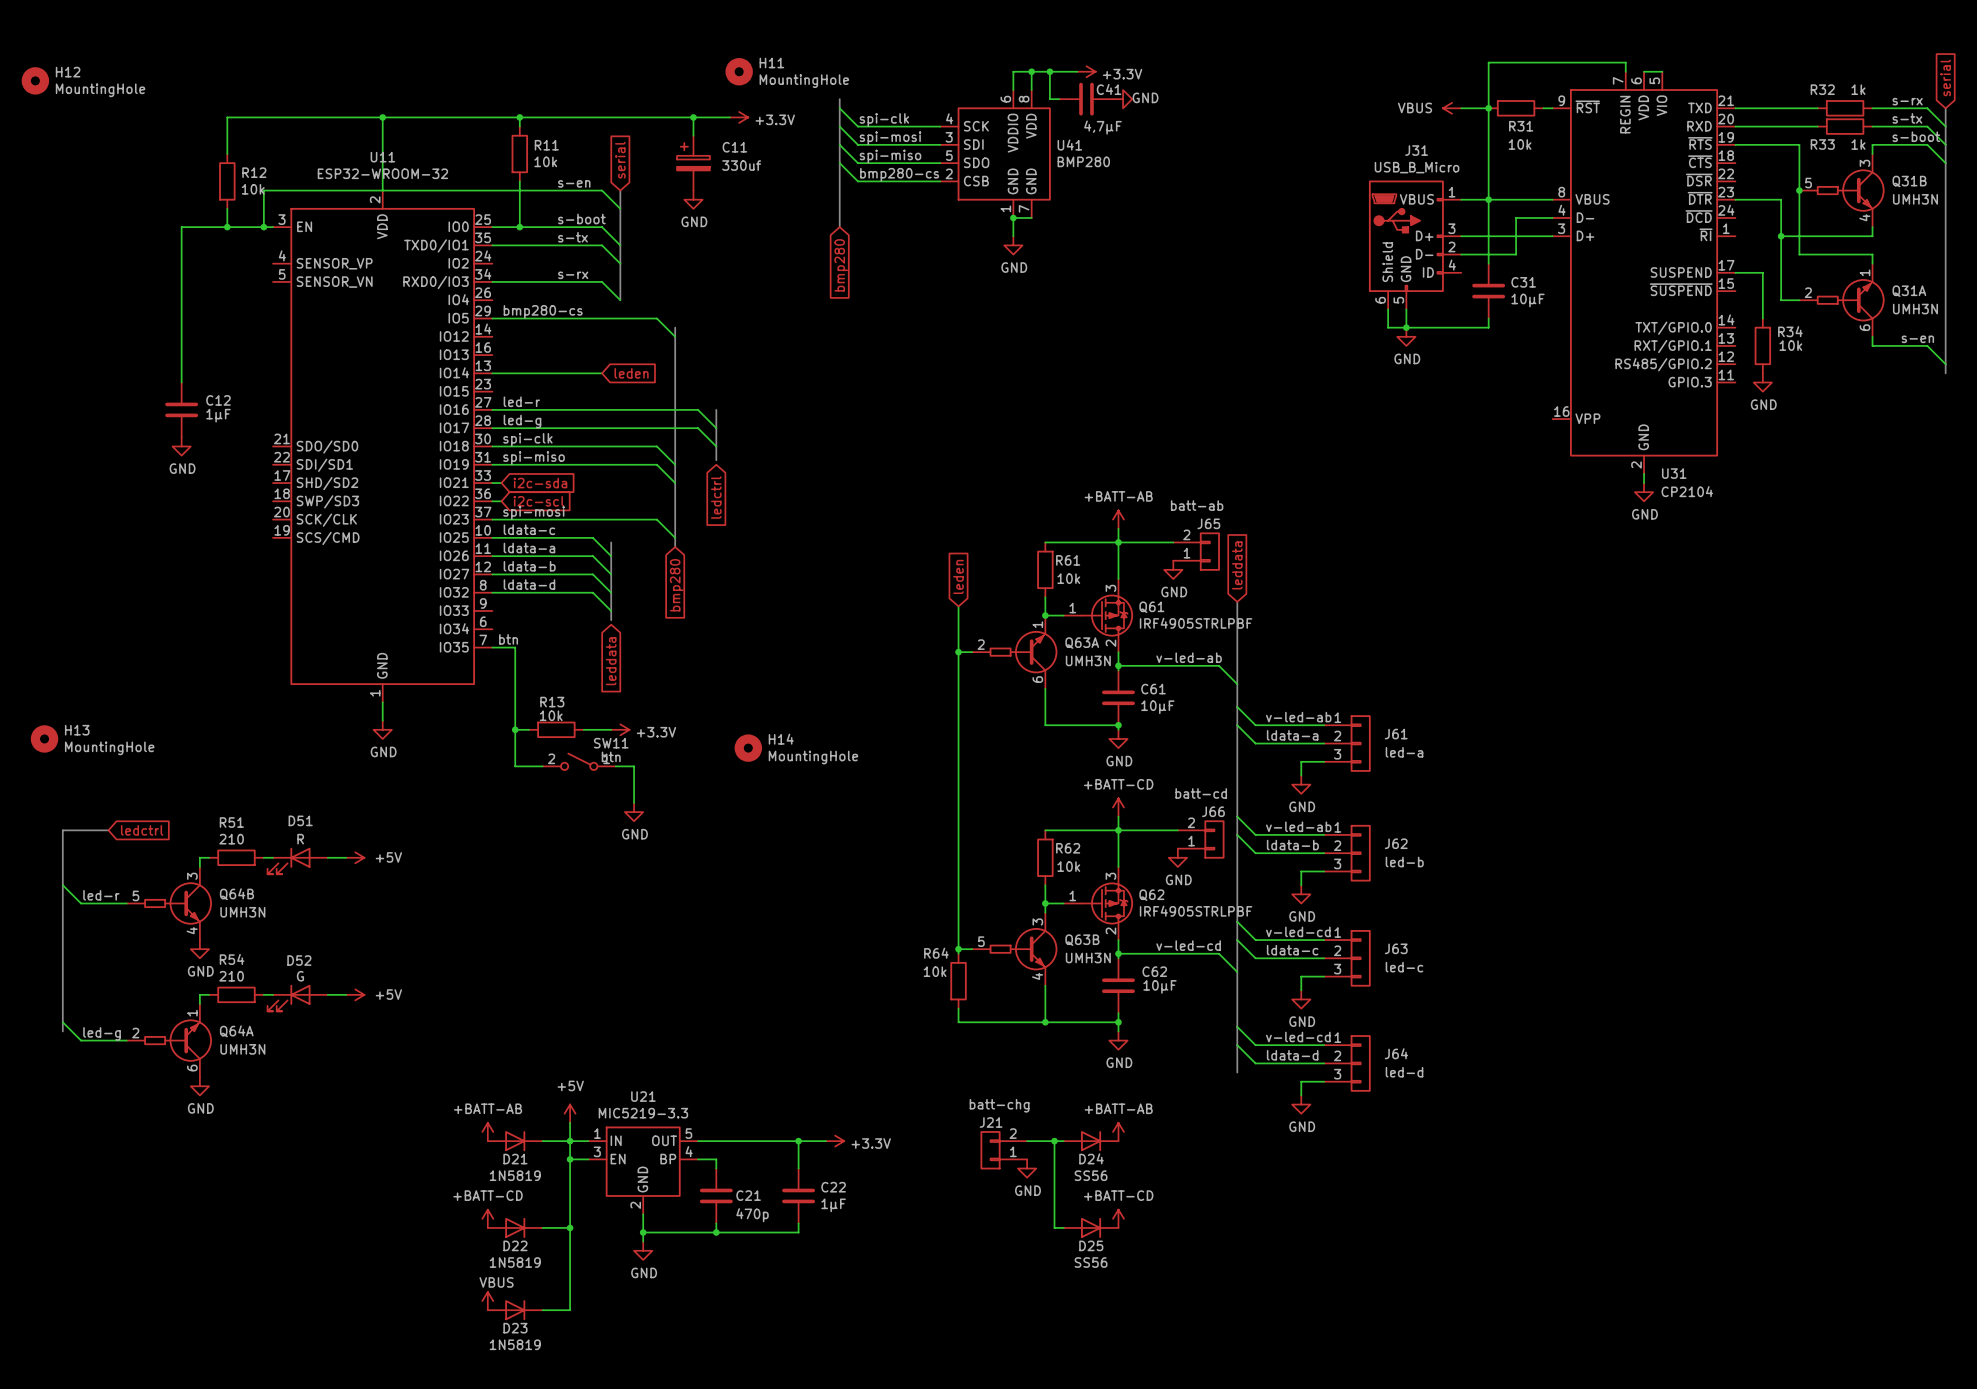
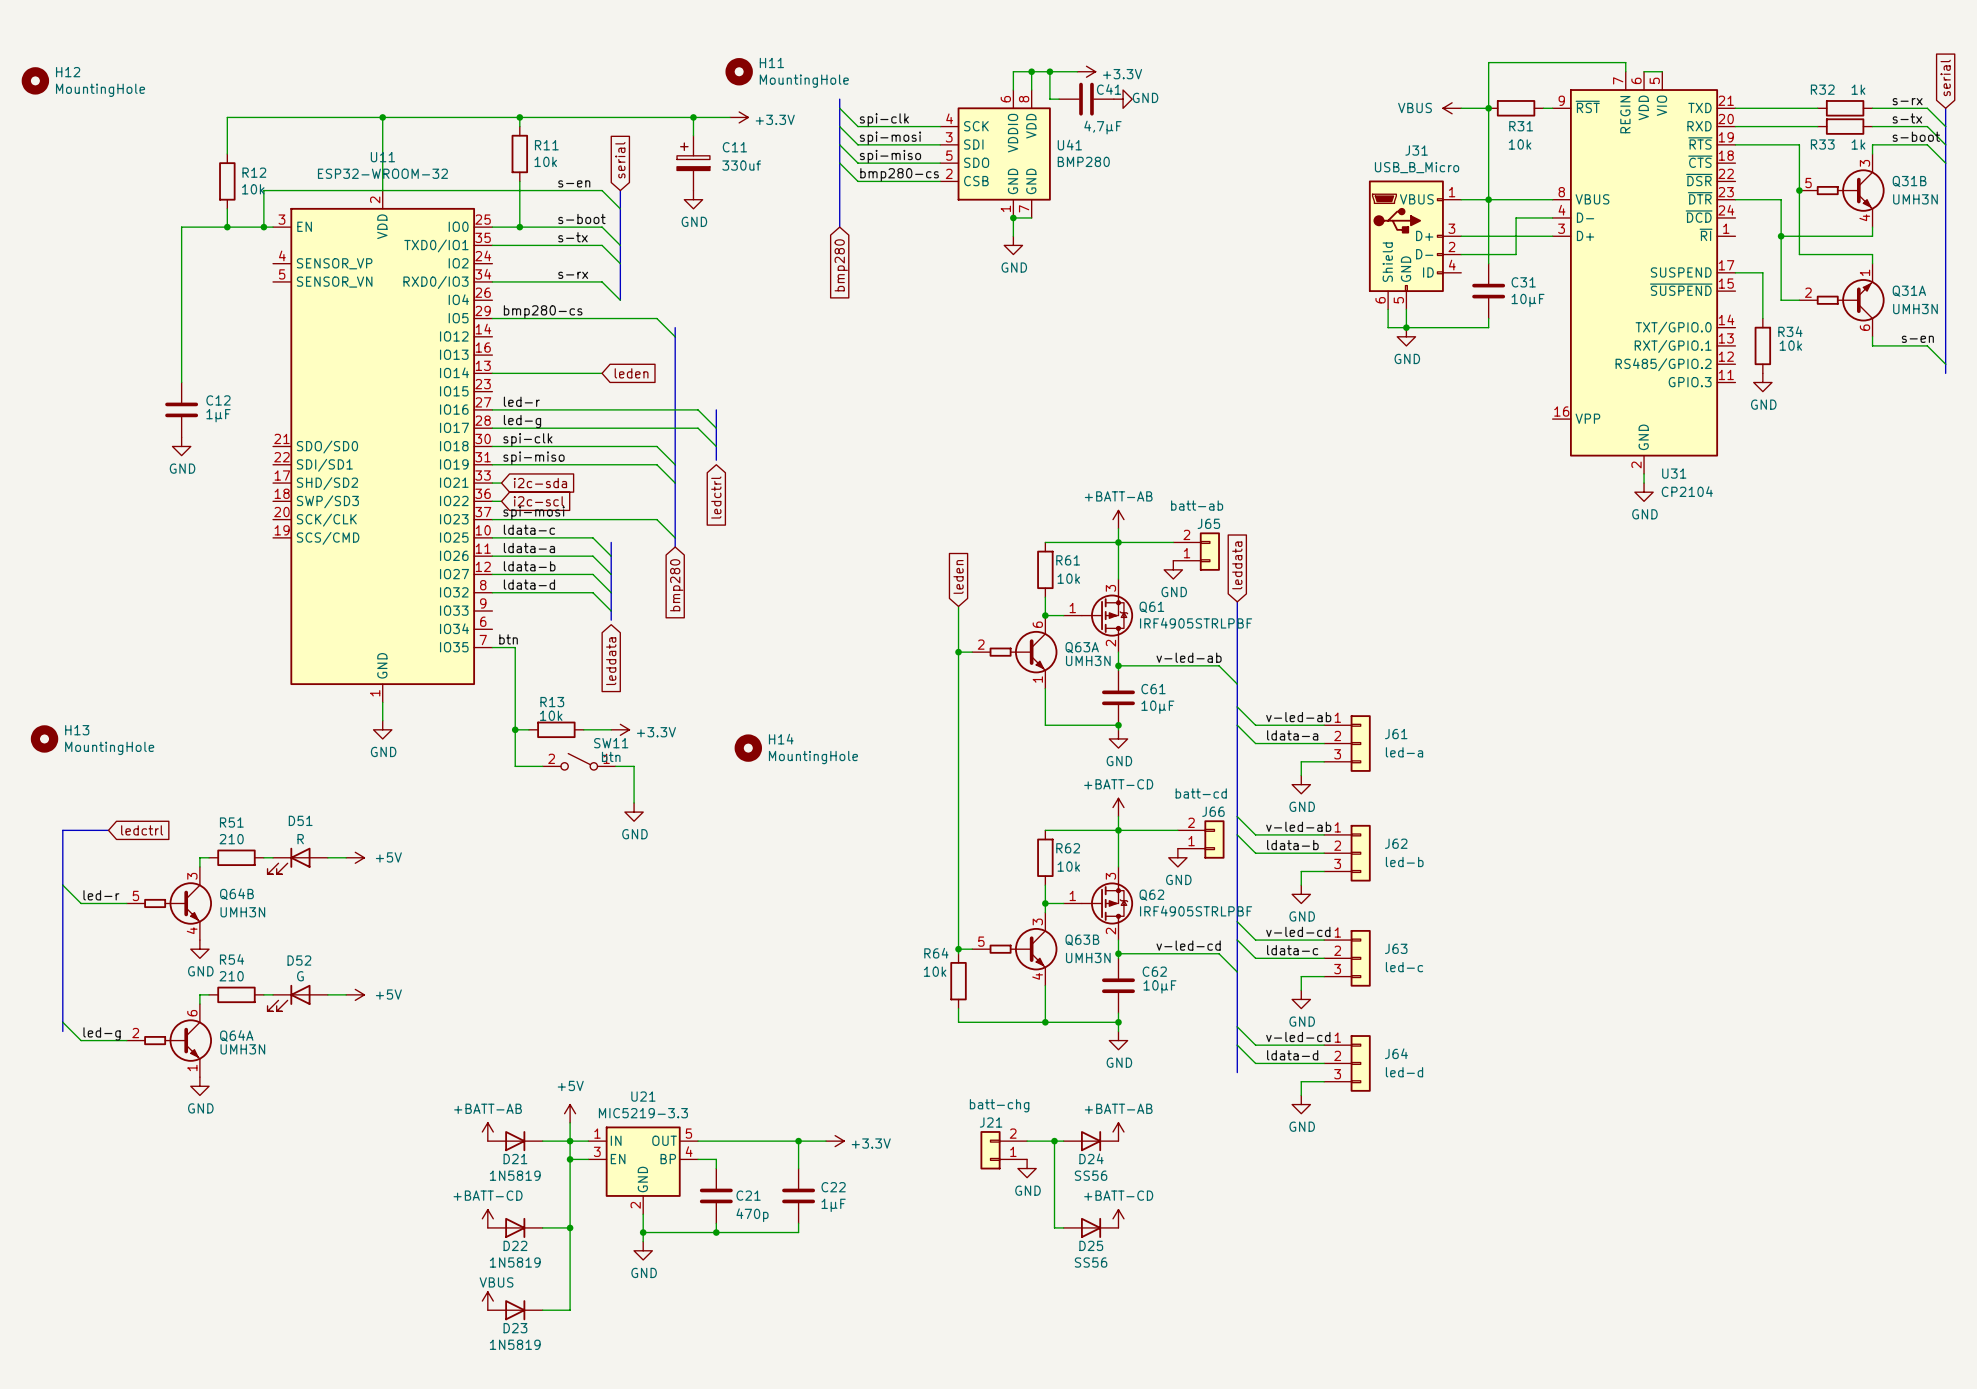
Q63A flip: as is (1023, 652) -> up-down (1023, 652)
Q64A flip: as is (178, 1040) -> up-down (178, 1040)

